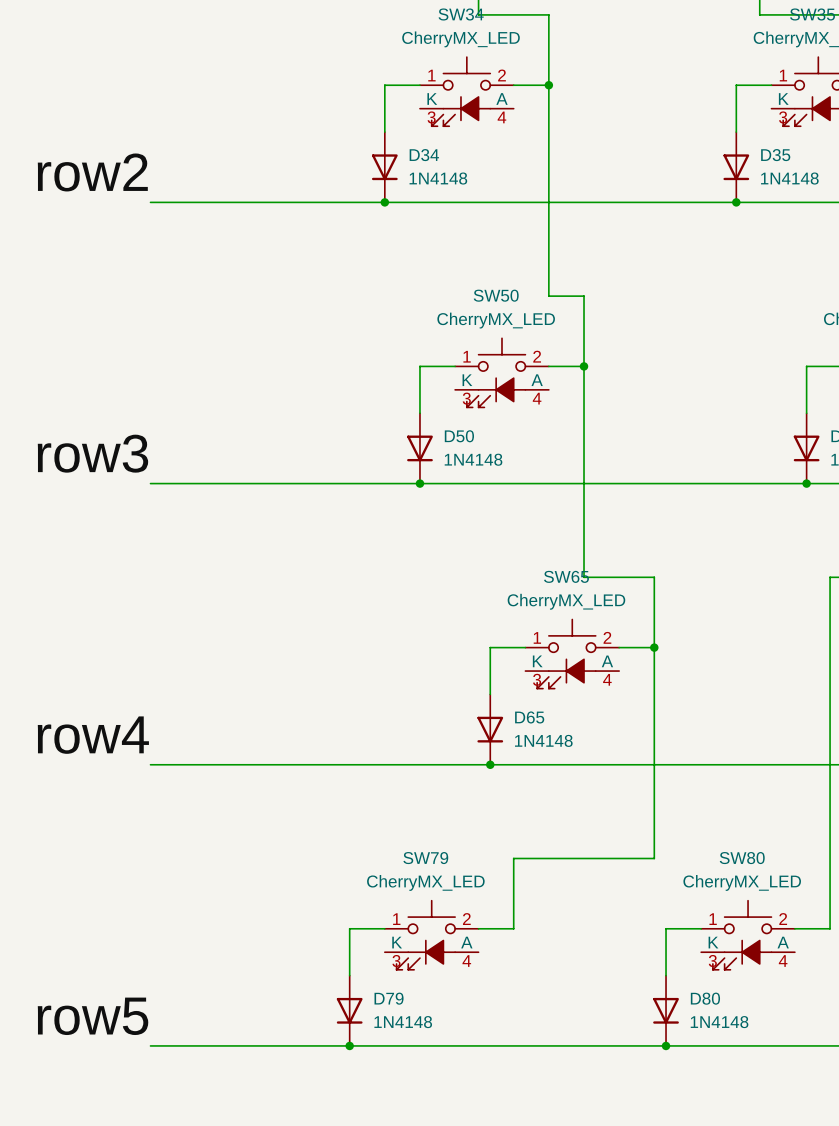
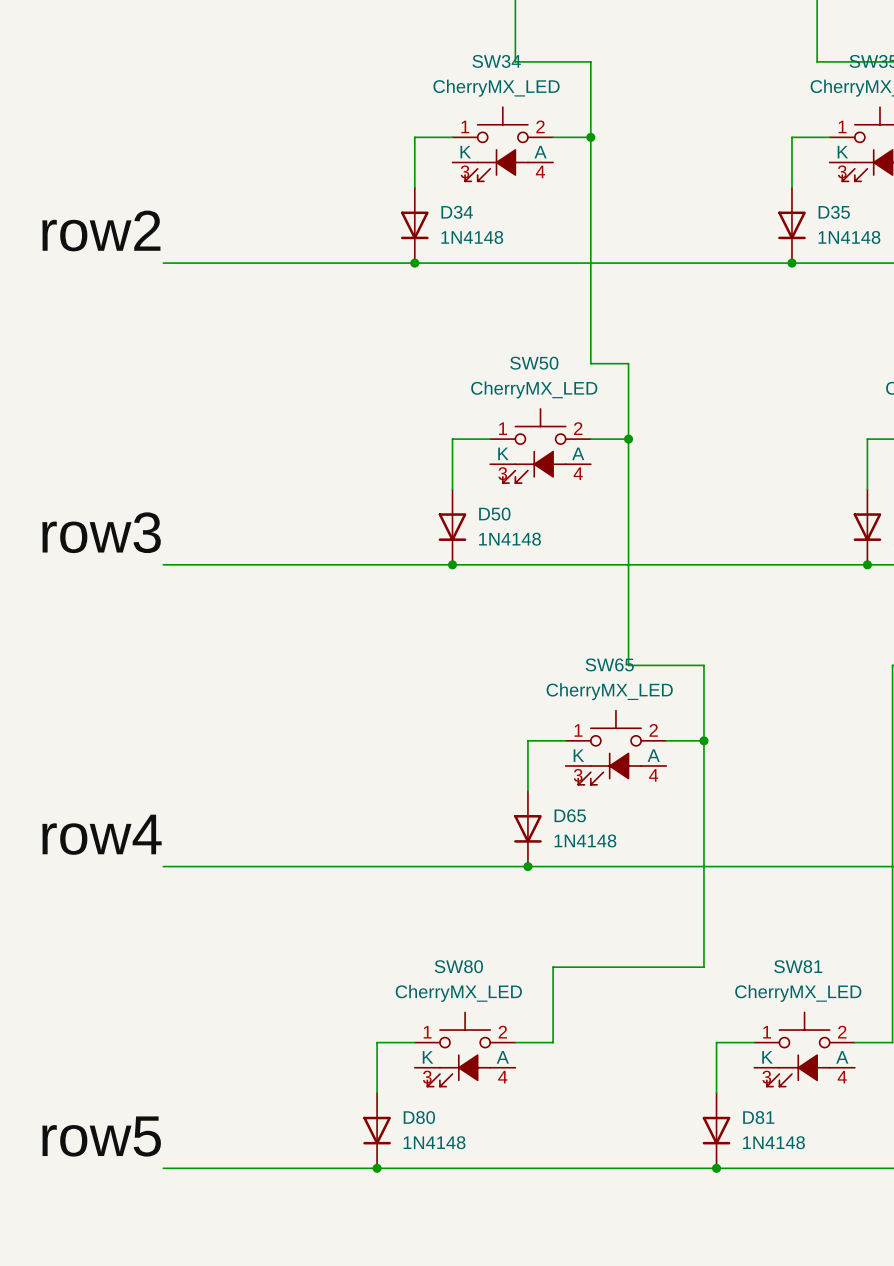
SW79 name: SW79 (425, 858) -> SW80 (458, 966)
SW80 name: SW80 (742, 858) -> SW81 (798, 966)
D79 name: D79 (389, 998) -> D80 (419, 1117)
D80 name: D80 (705, 998) -> D81 (758, 1117)

